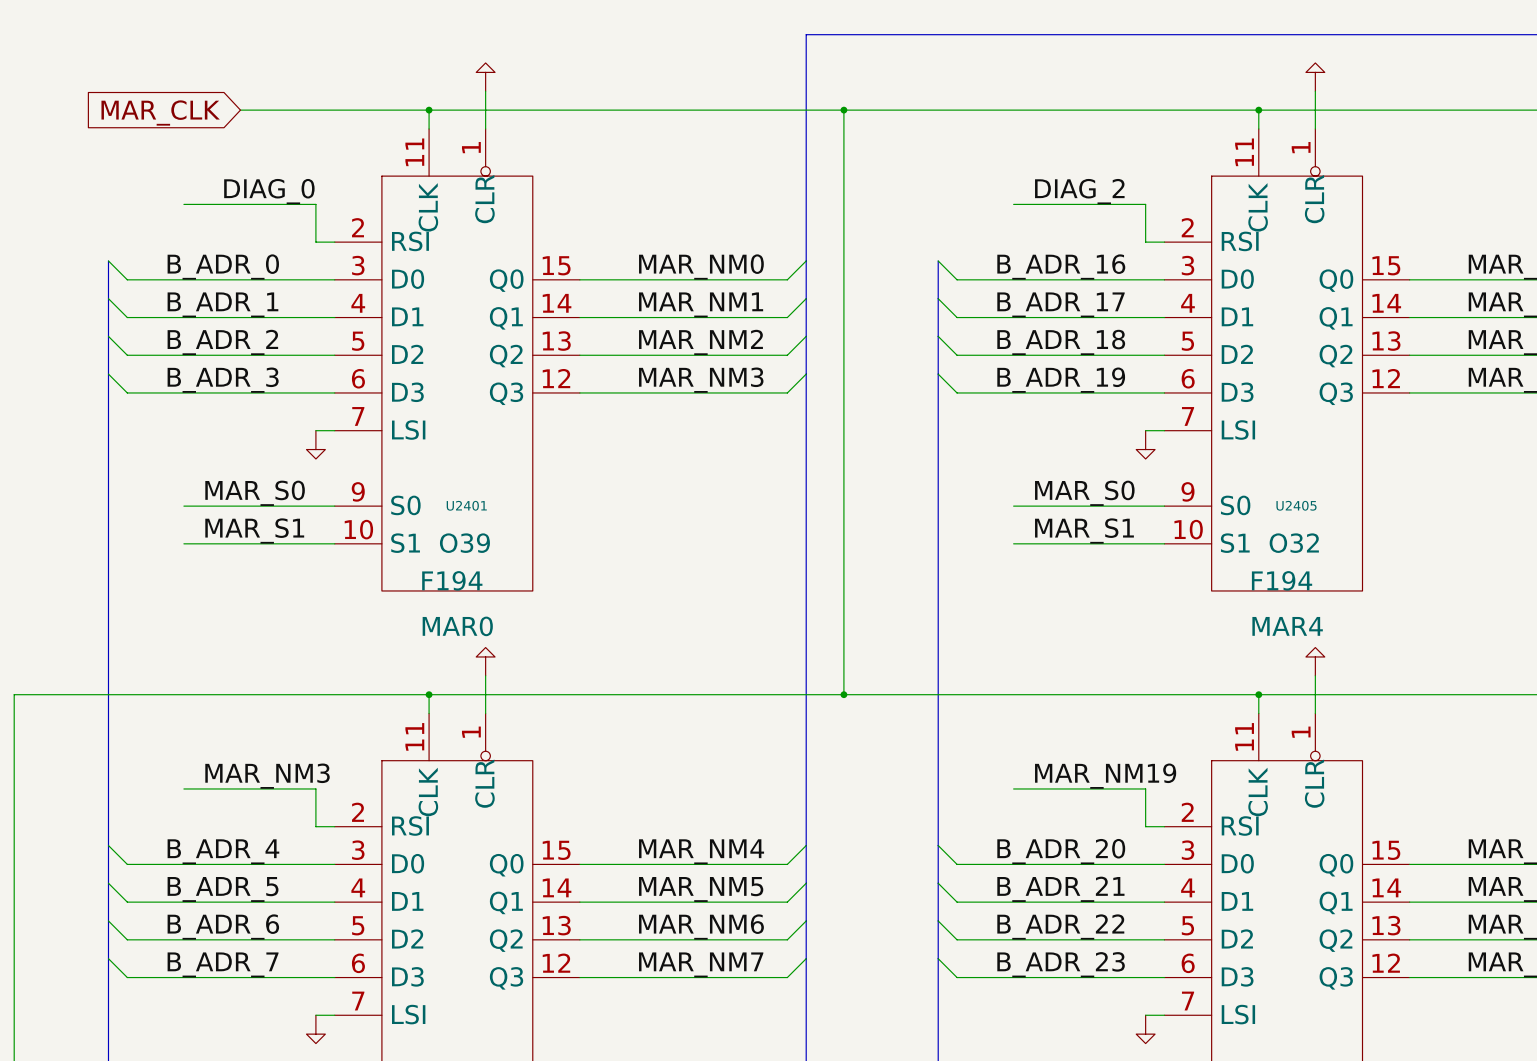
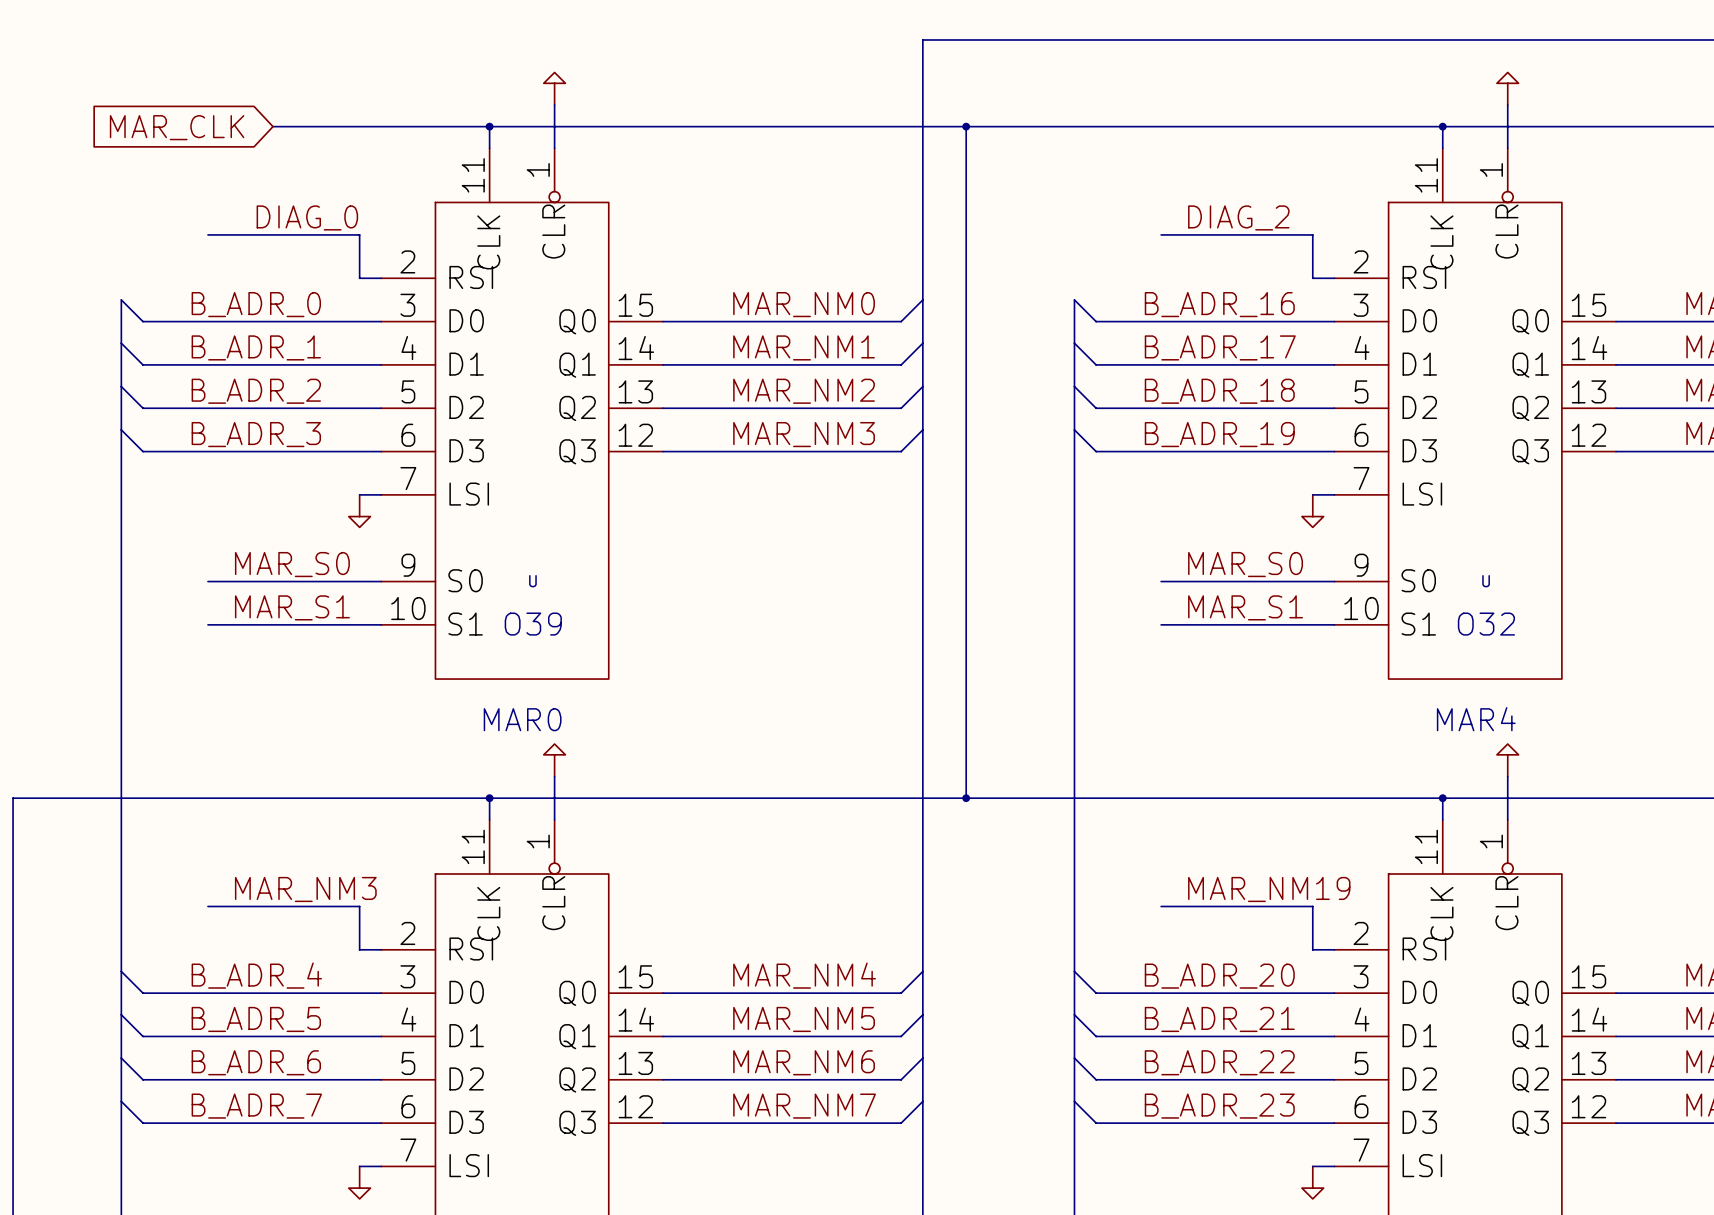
U2401 name: U2401 (466, 505) -> U (532, 581)
U2405 name: U2405 (1296, 505) -> U (1486, 581)
U2401 value: F194 (452, 580) -> none
U2405 value: F194 (1282, 580) -> none

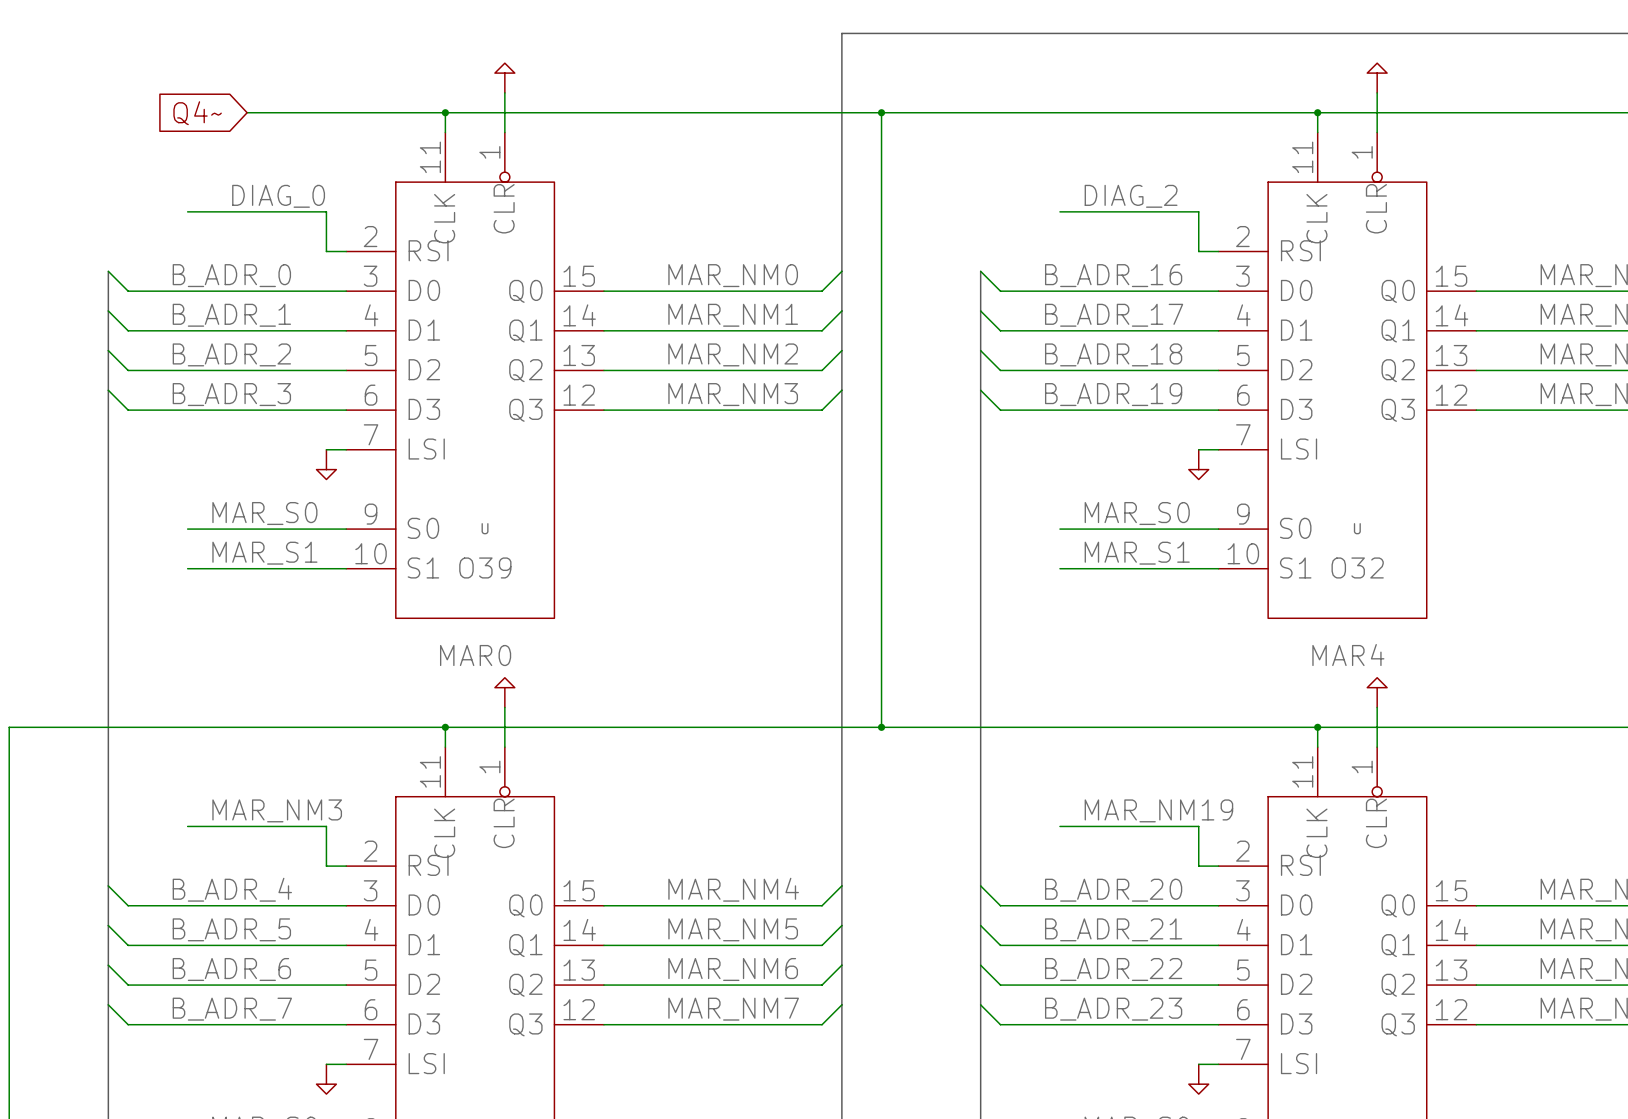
global label: MAR_CLK (177, 127) -> Q4~ (197, 113)

